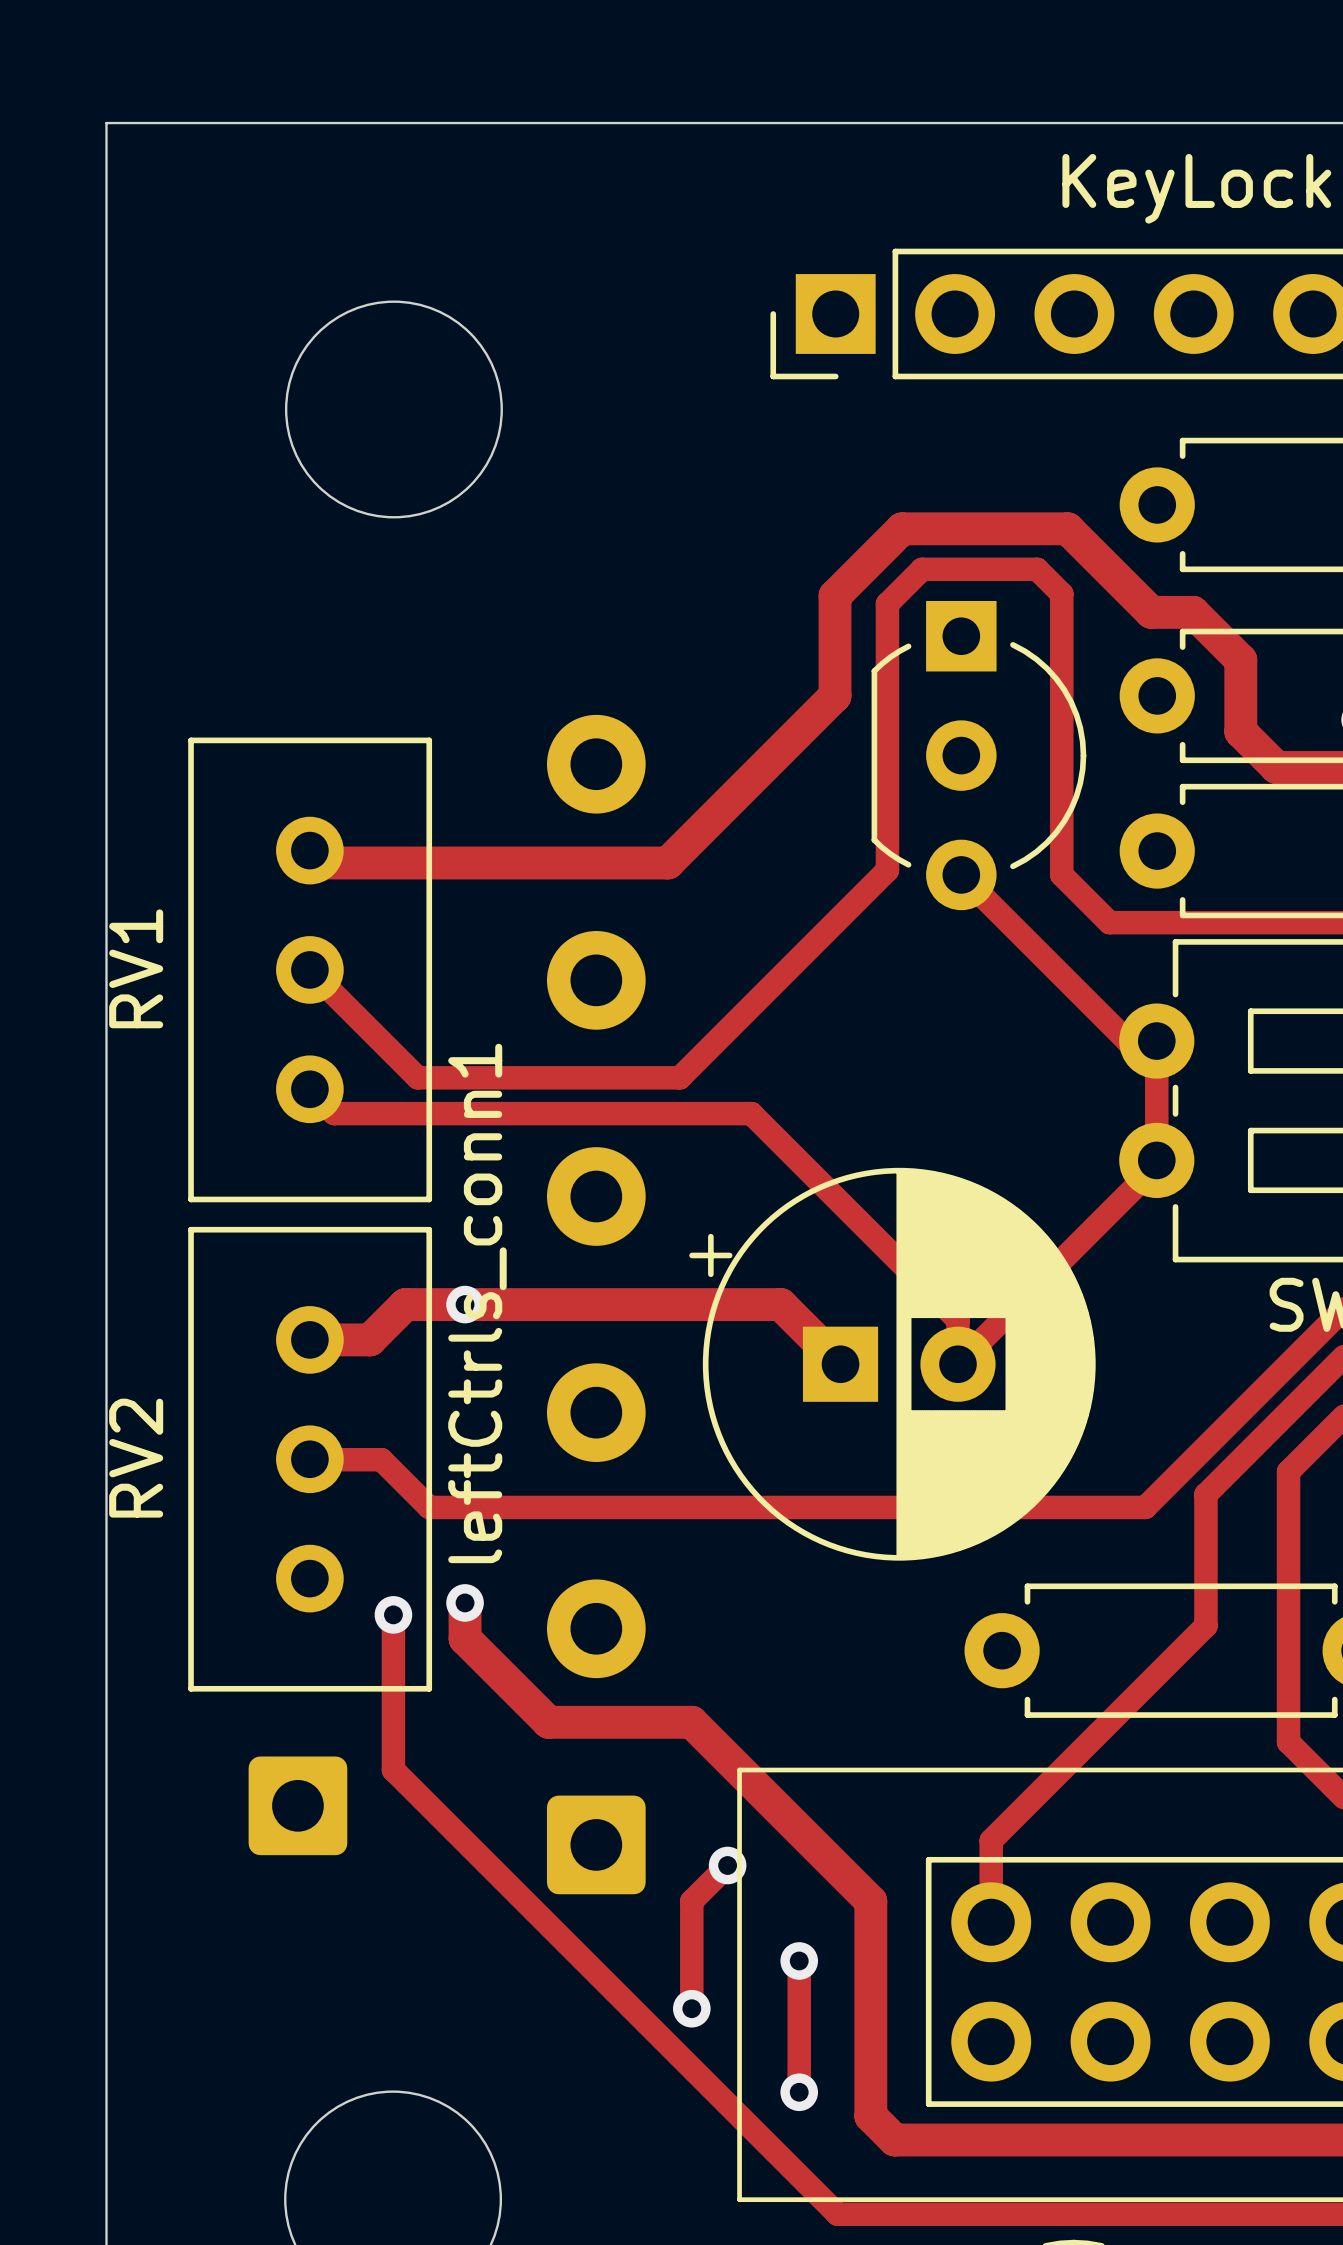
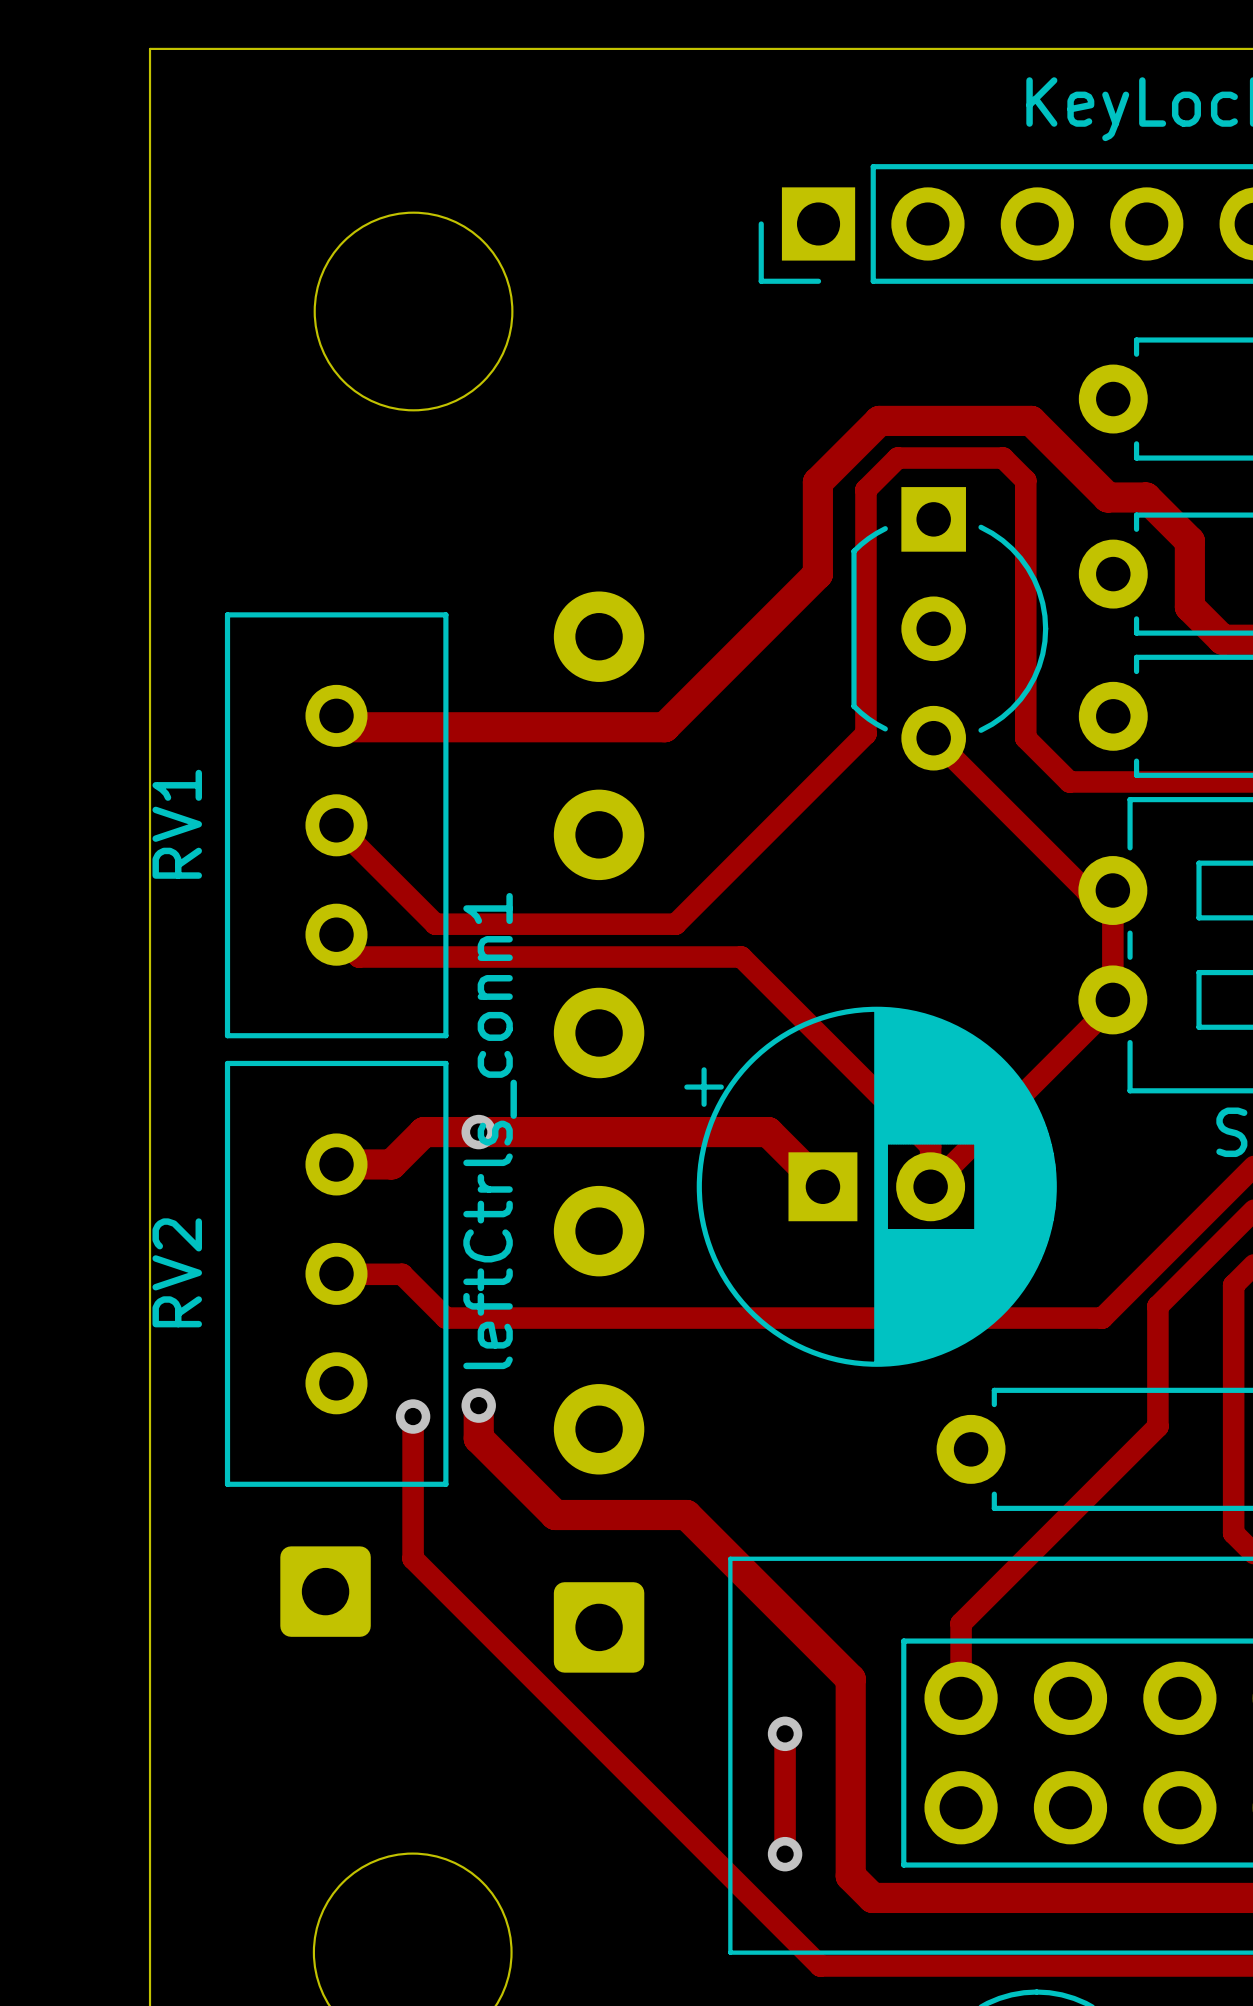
track: (727, 1865) (691, 1901) (691, 2008) -> none
via: (727, 1865) -> none
via: (691, 2008) -> none

